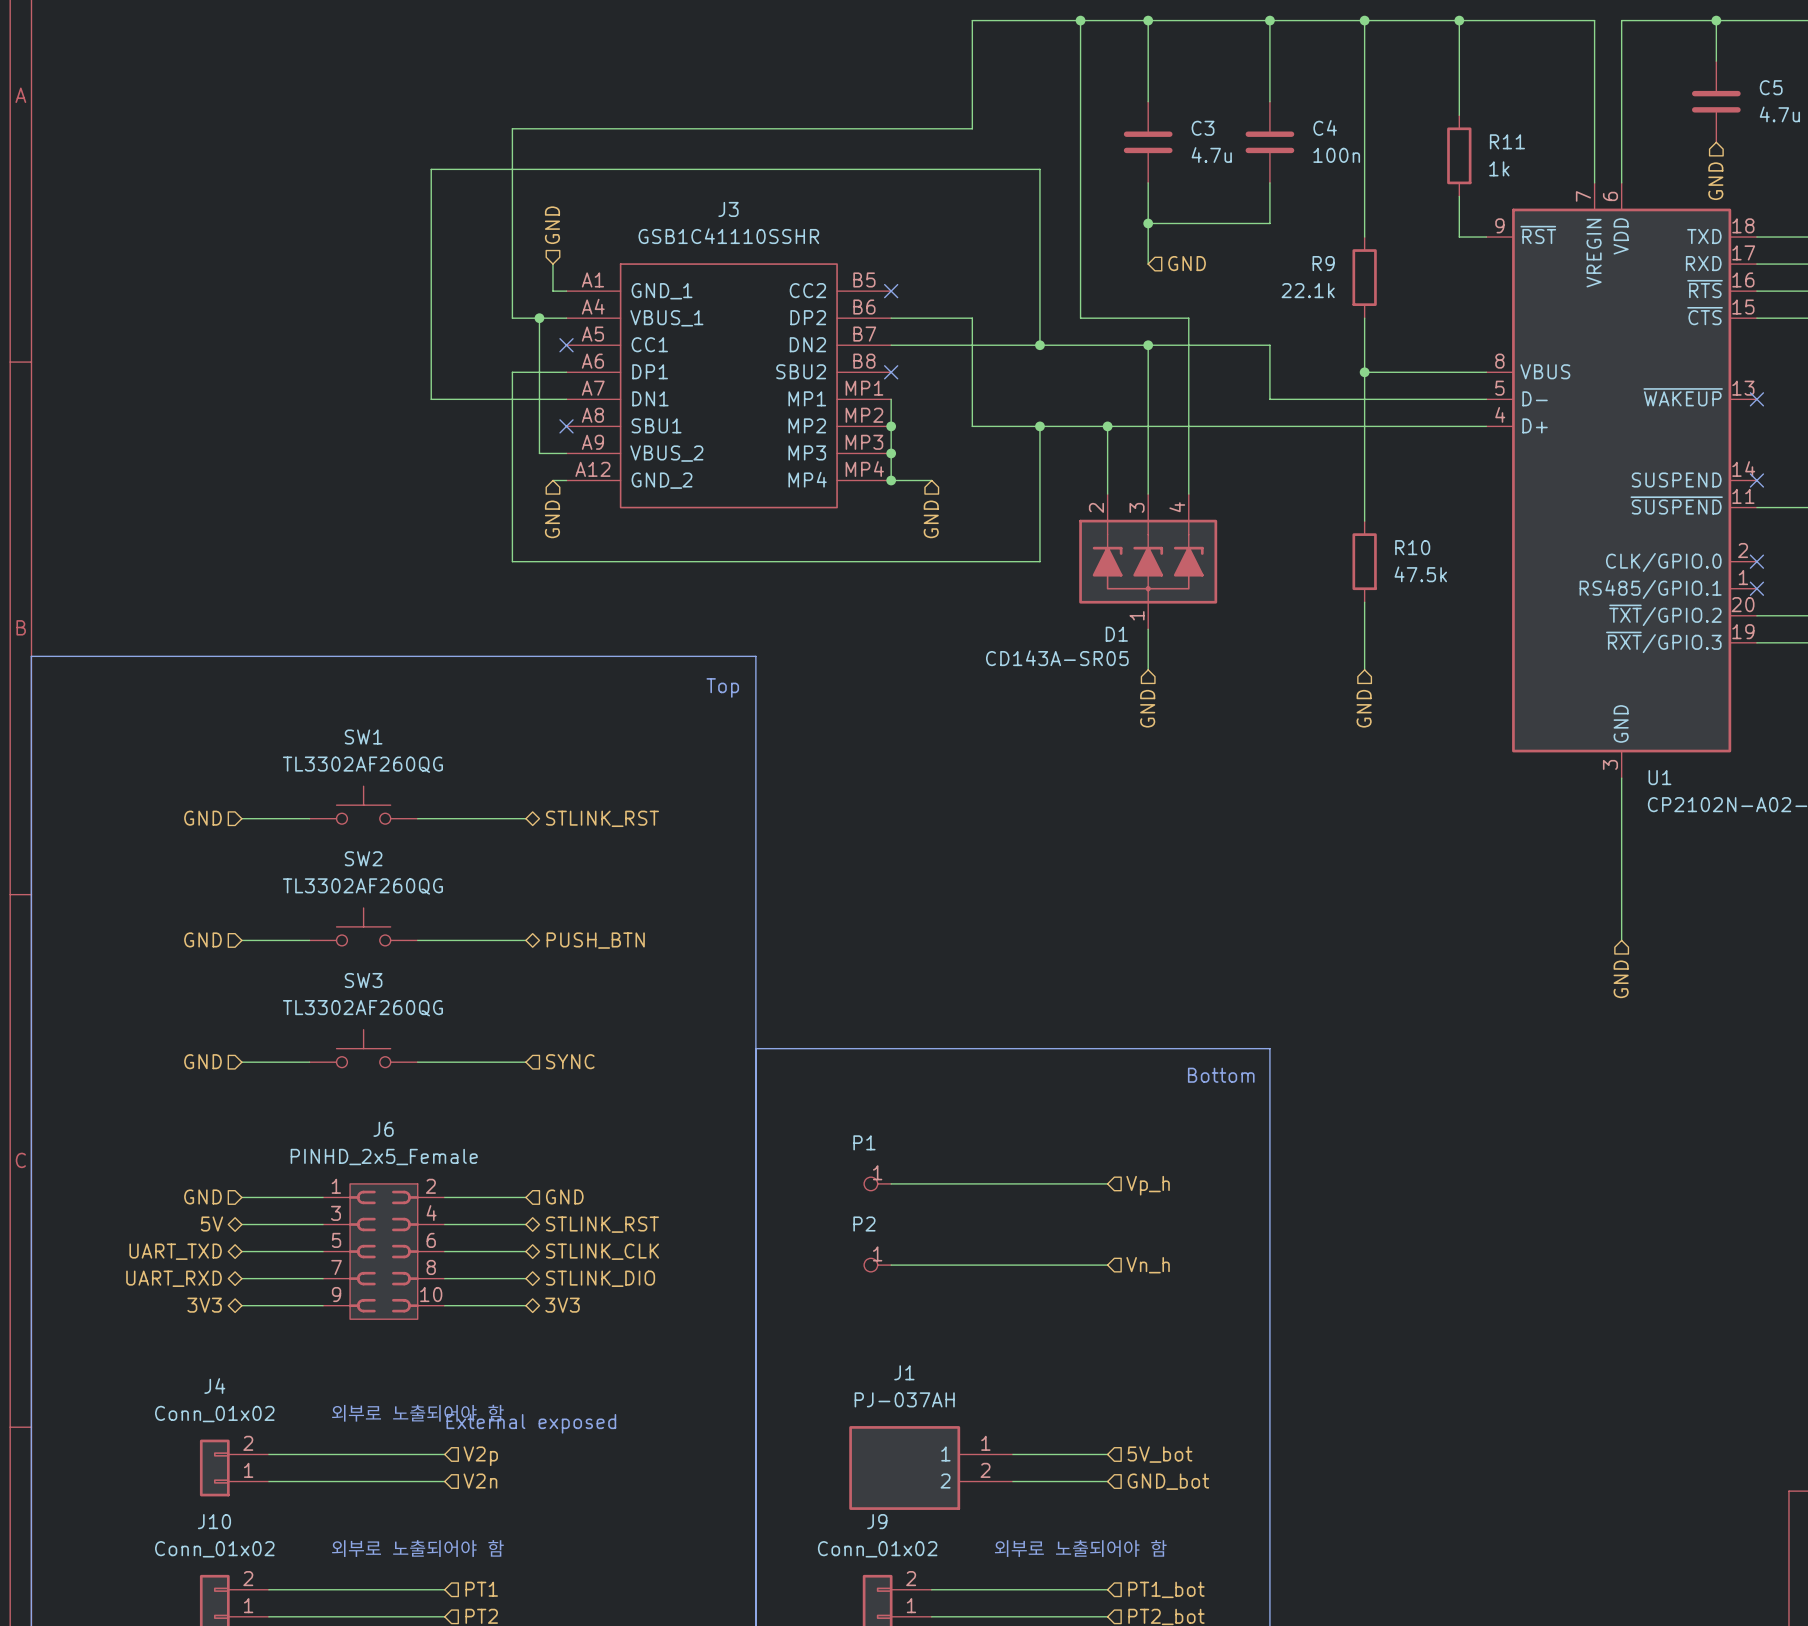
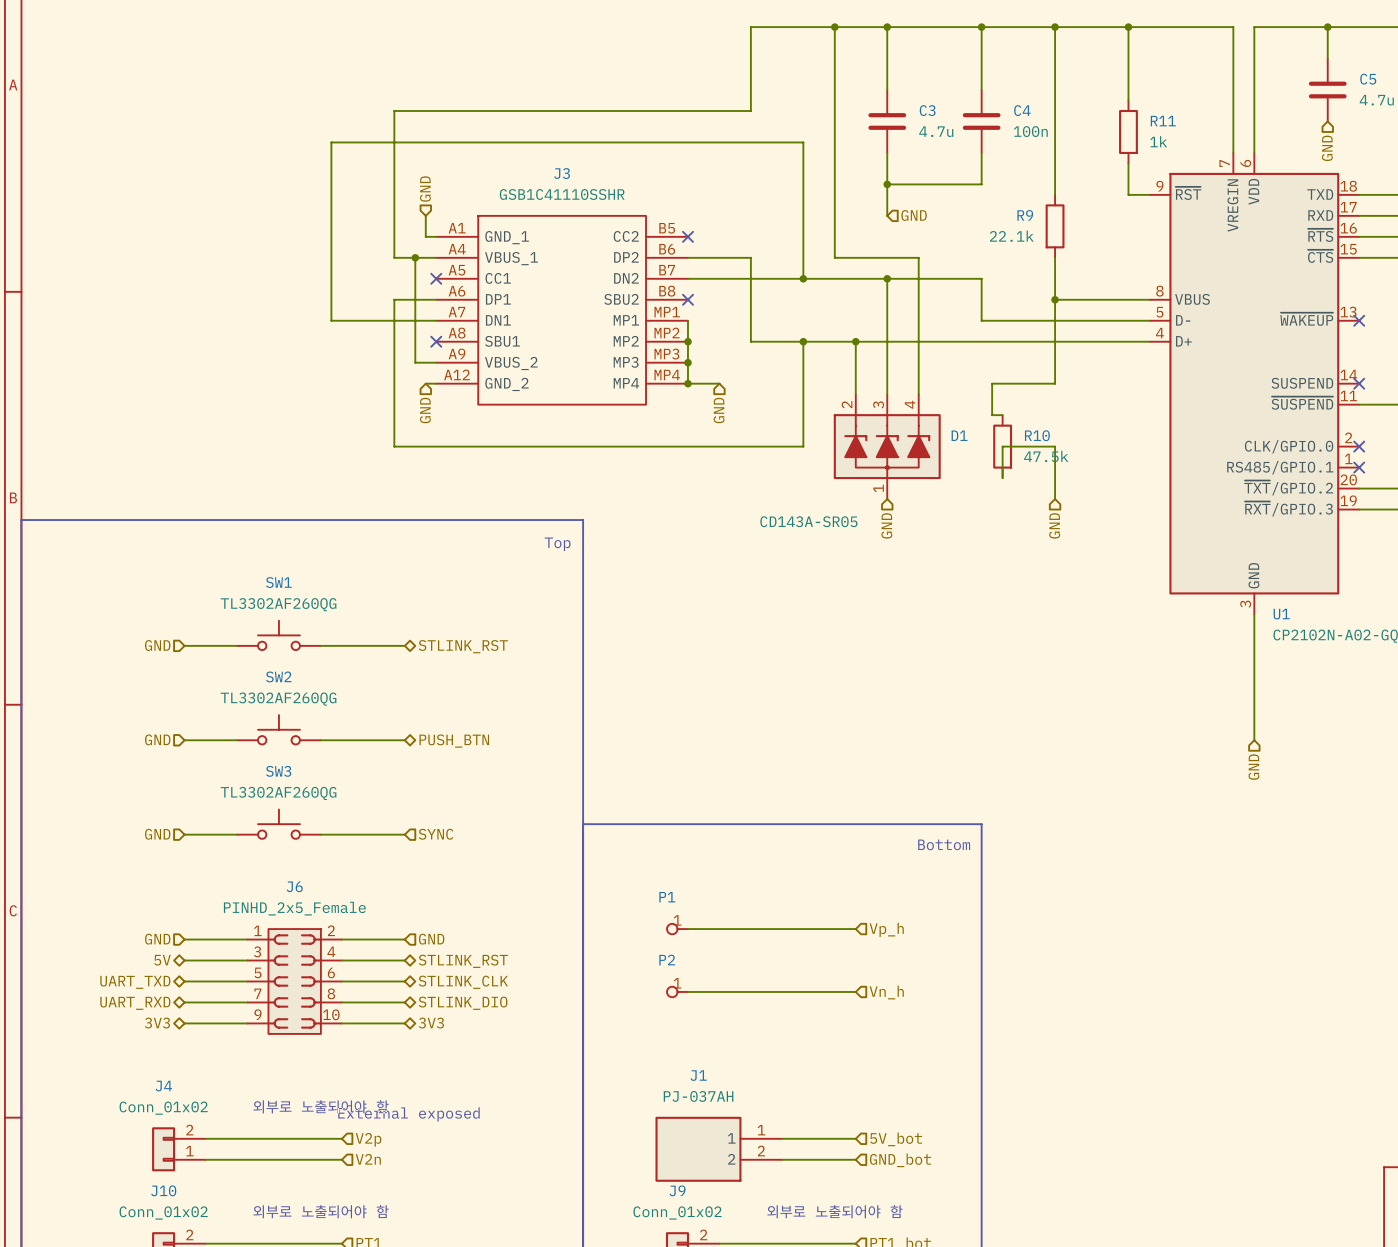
wire: (1364, 480) (1364, 521) -> (1055, 383) (992, 383) (992, 415) (1002, 415)
R10 position: (1364, 561) -> (1002, 446)
wire: none -> (1002, 478) (1002, 446) (1055, 446) (1055, 478)
wire: (1148, 629) (1148, 669) -> none
wire: (1364, 629) (1364, 669) -> none
D1 name position: D1 (1116, 634) -> D1 (959, 435)
hierarchical label position: GND (1147, 708) -> GND (886, 525)
hierarchical label position: GND (1364, 708) -> GND (1054, 525)

